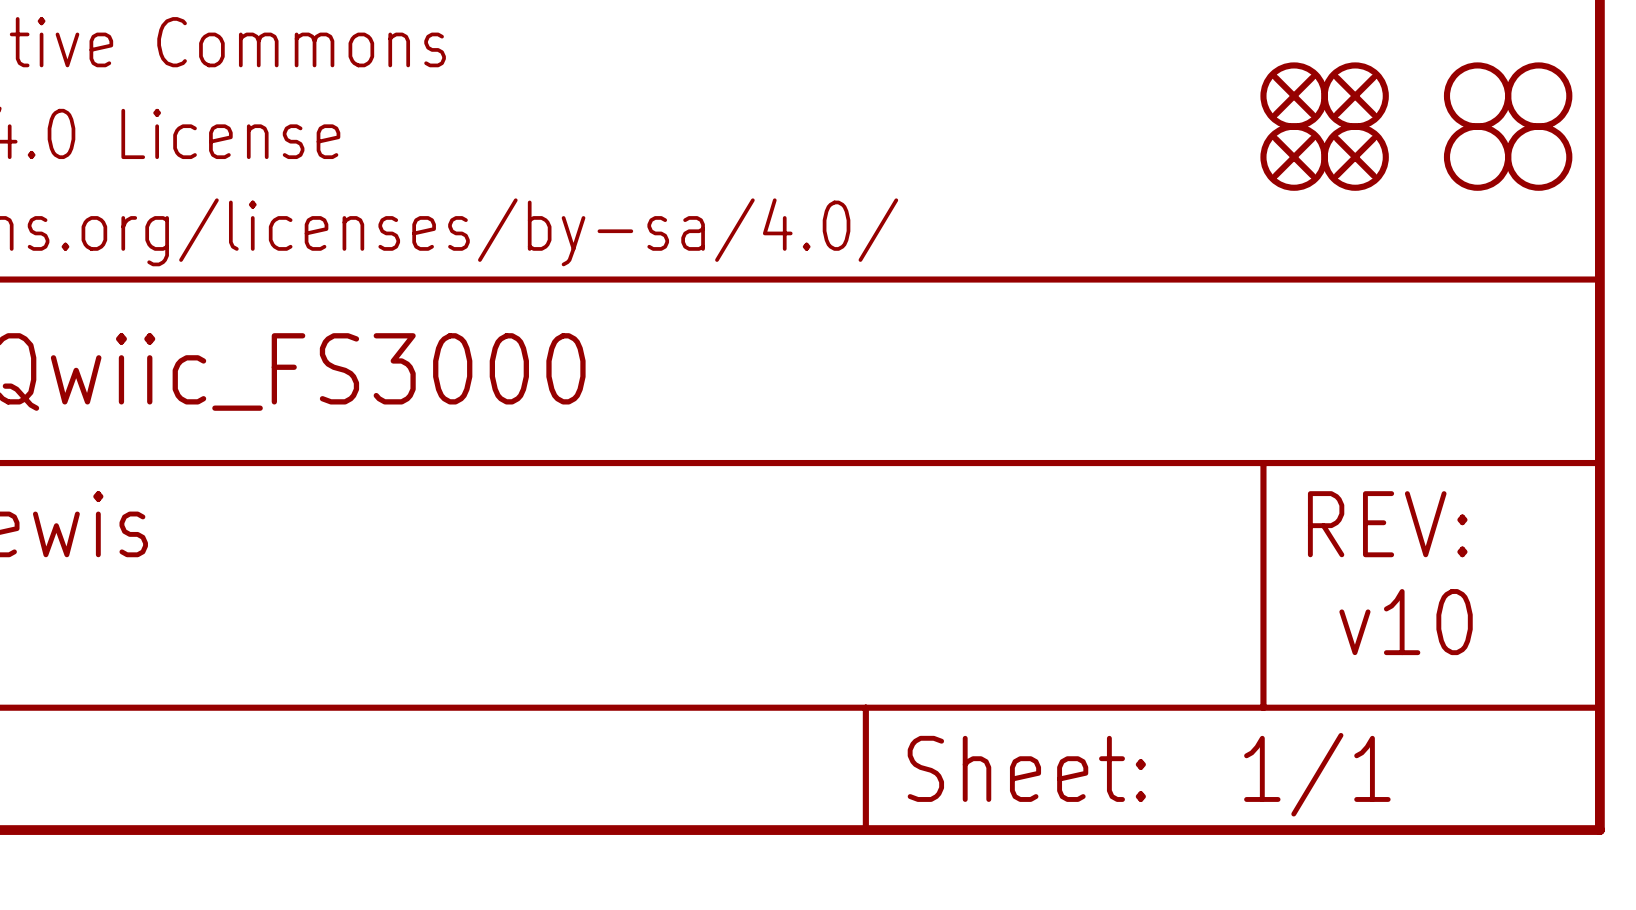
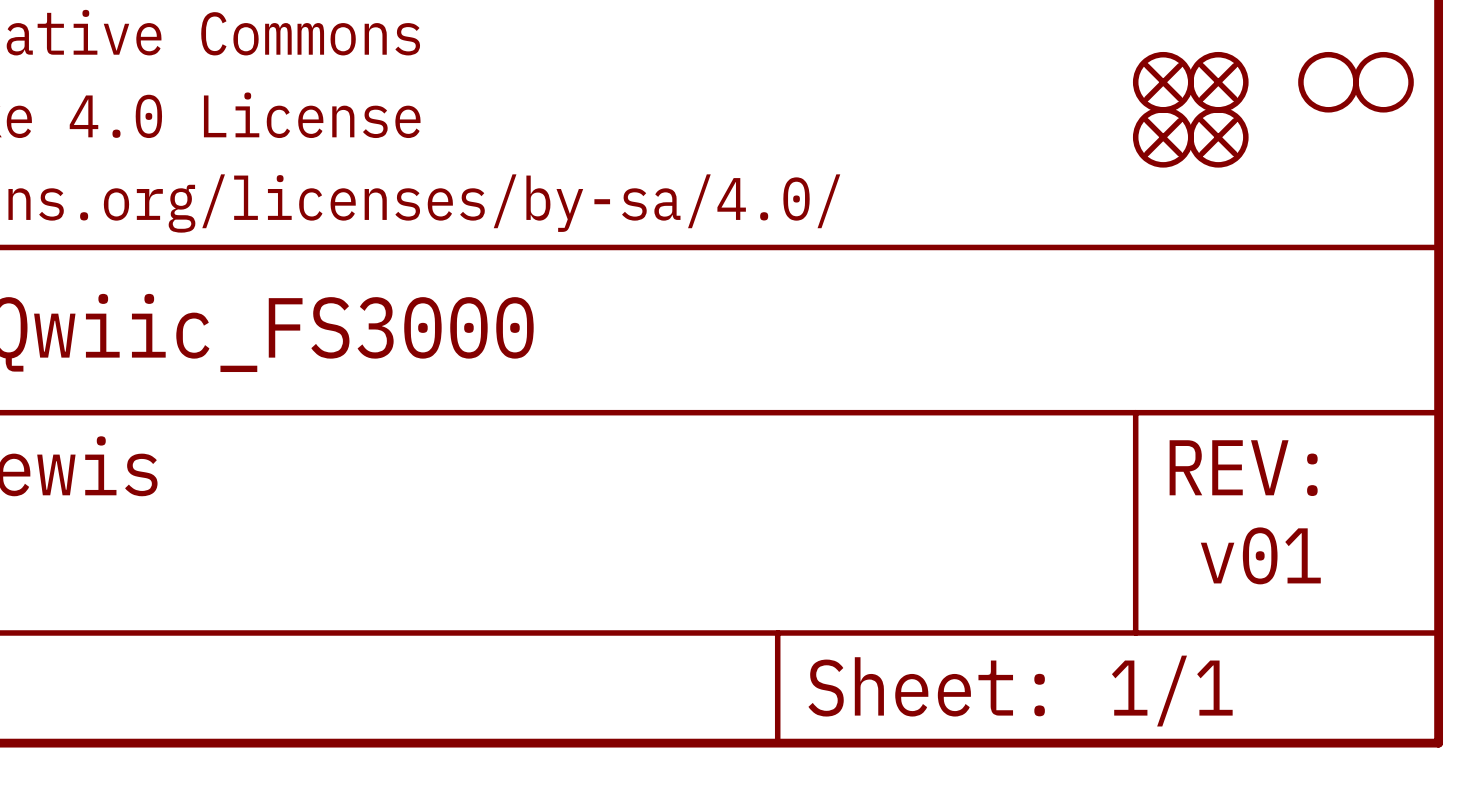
part: (1477, 157) -> none
part: (1538, 157) -> none
text: v10 (1406, 622) -> v01 (1260, 555)

